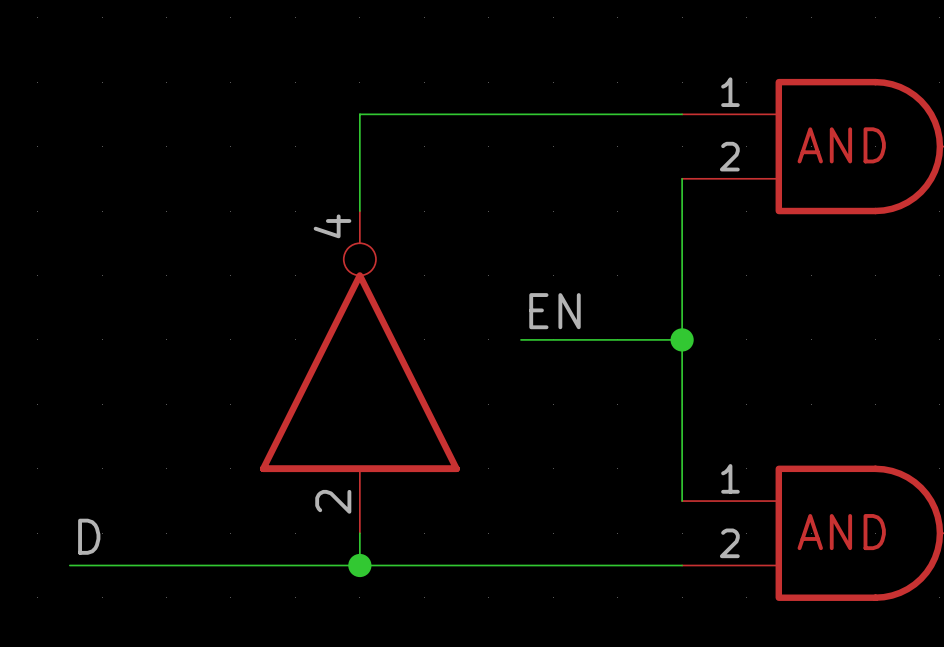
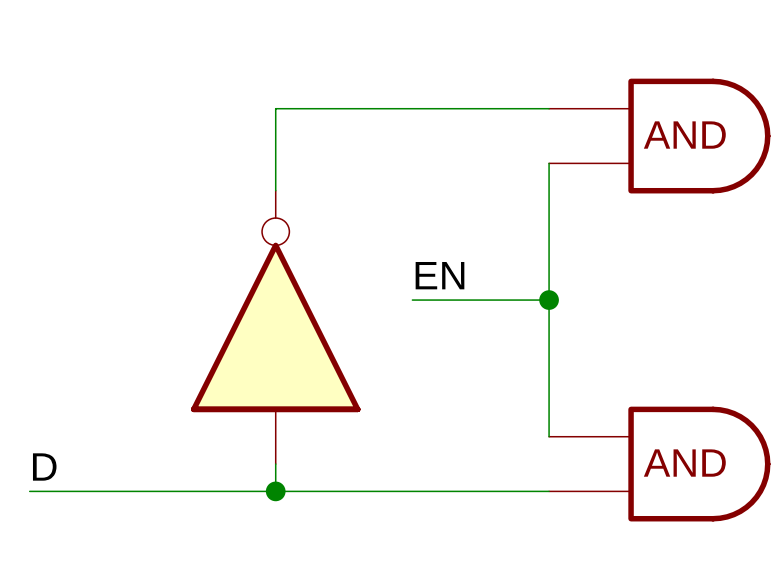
part pin number: 1 (730, 92) -> none
part pin number: 2 (729, 156) -> none
part pin number: 4 (332, 226) -> none
part pin number: 1 (730, 478) -> none
part pin number: 2 (333, 501) -> none
part pin number: 2 (729, 543) -> none

